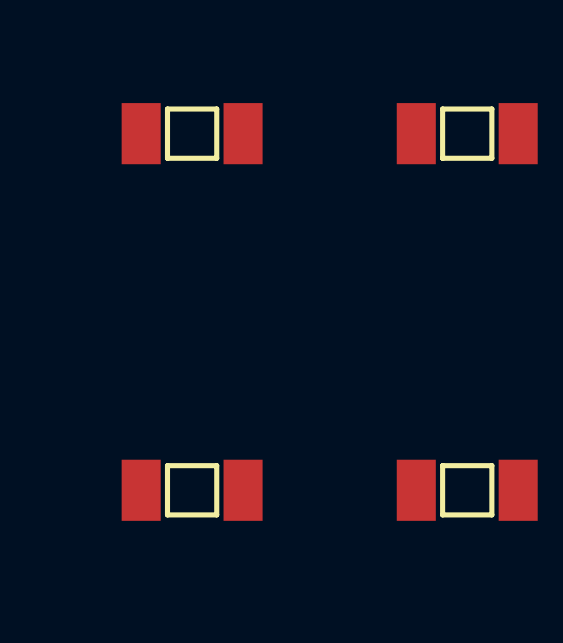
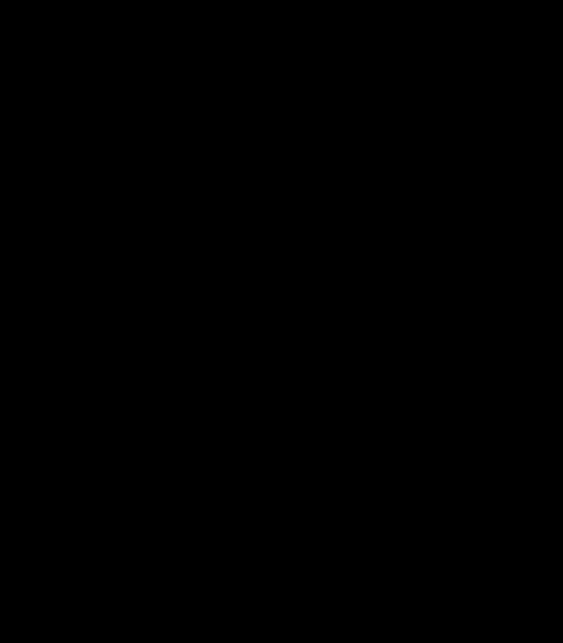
part: (192, 133) -> none
part: (467, 133) -> none
part: (192, 490) -> none
part: (467, 490) -> none

